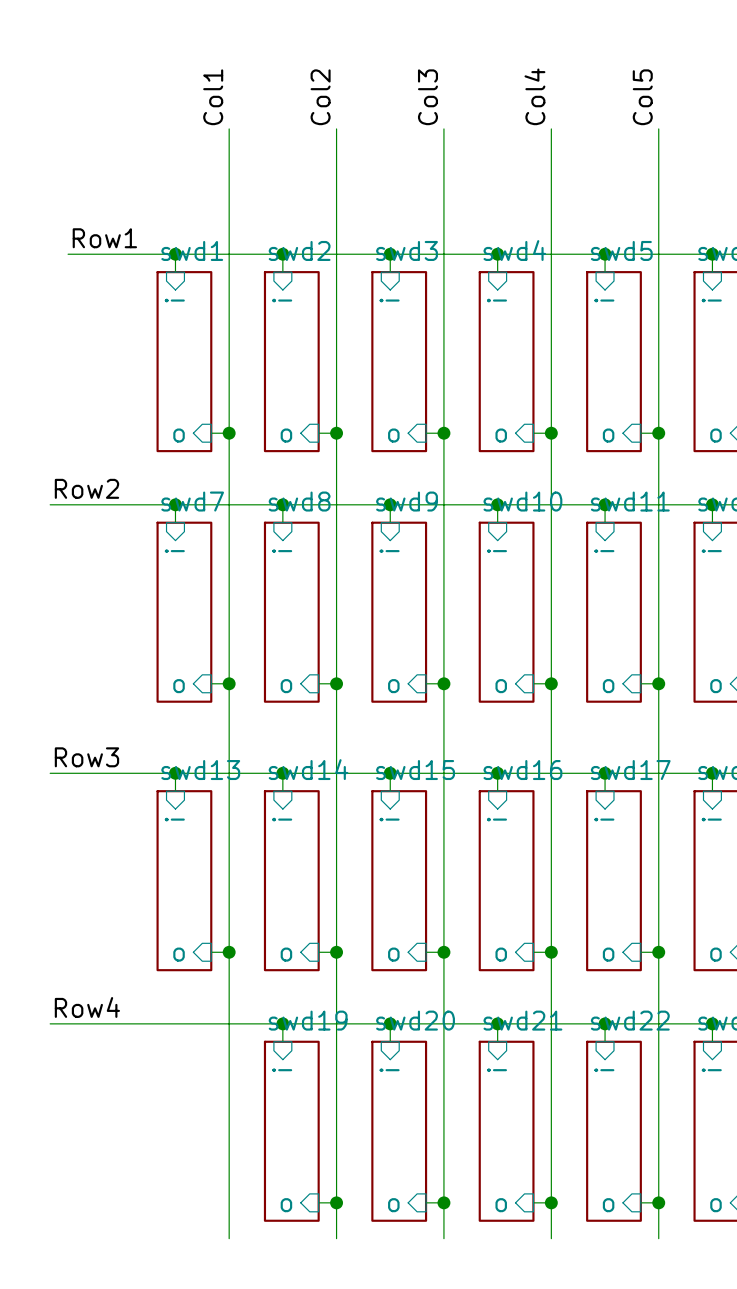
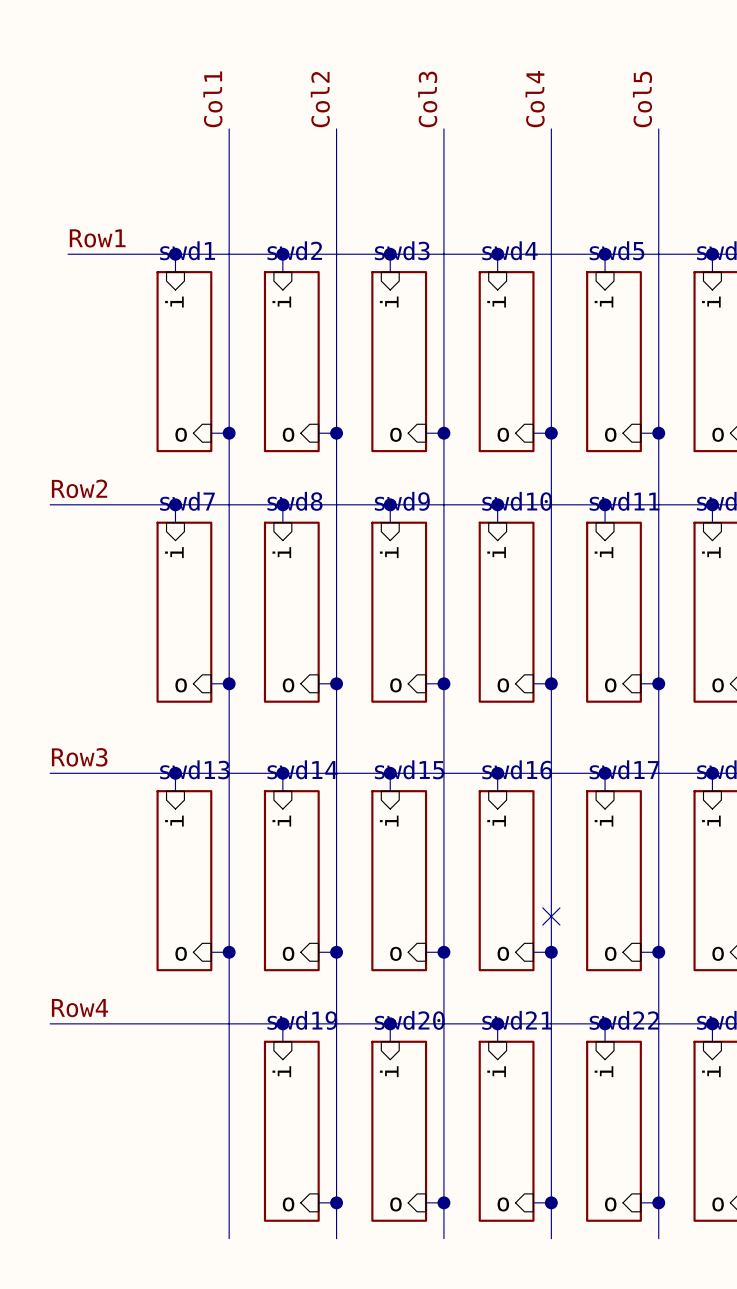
no-connect mark: none -> (551, 916)

